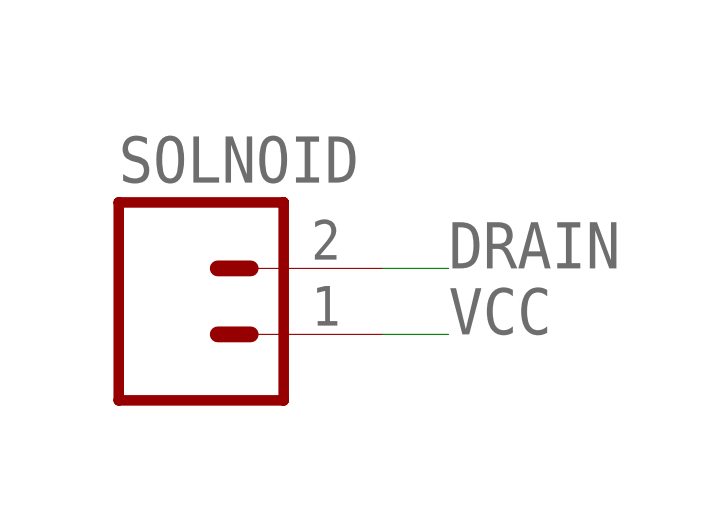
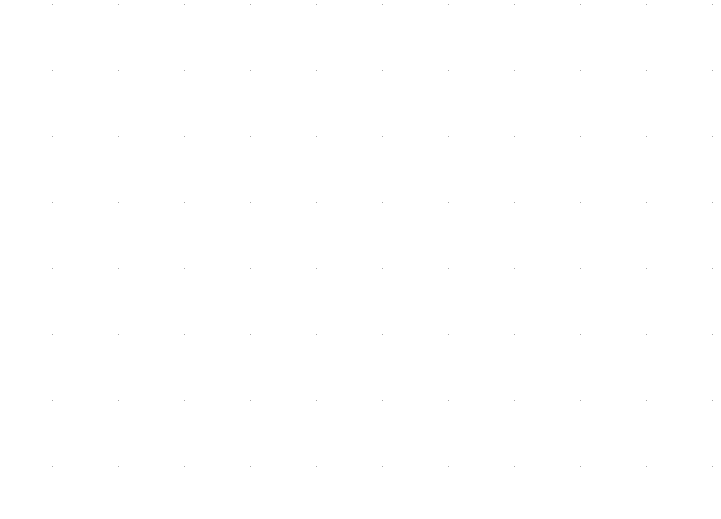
label: DRAIN (534, 245) -> none
wire: (382, 268) (448, 268) -> none
SOLNOID: (248, 301) -> none
label: VCC (498, 311) -> none
wire: (382, 334) (448, 334) -> none

